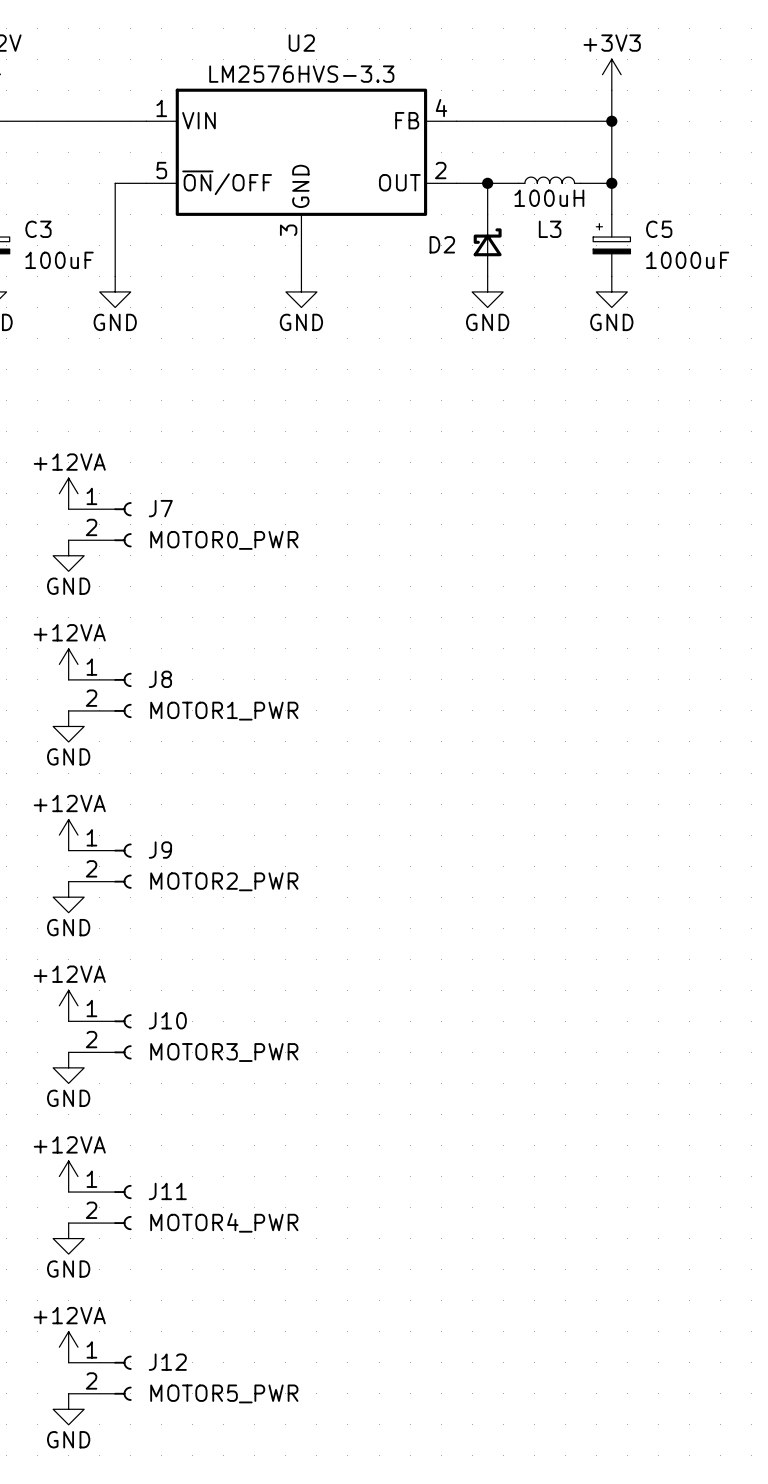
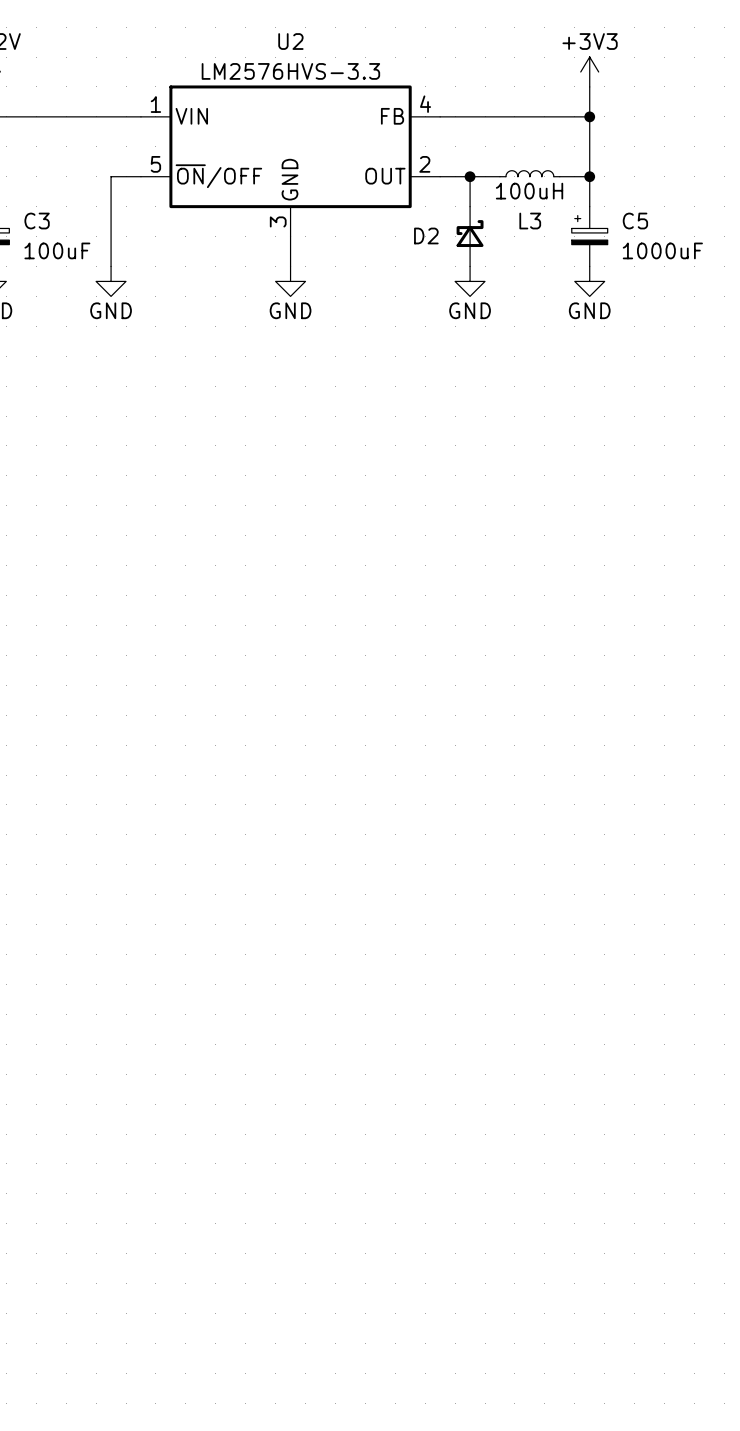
power symbol: +12VA (68, 493) -> none
J7: MOTOR0_PWR (100, 524) -> none
power symbol: GND (68, 555) -> none
power symbol: +12VA (68, 664) -> none
J8: MOTOR1_PWR (100, 695) -> none
power symbol: GND (68, 726) -> none
power symbol: +12VA (68, 835) -> none
J9: MOTOR2_PWR (100, 866) -> none
power symbol: GND (68, 897) -> none
power symbol: +12VA (68, 1005) -> none
J10: MOTOR3_PWR (100, 1036) -> none
power symbol: GND (68, 1067) -> none
power symbol: +12VA (68, 1176) -> none
J11: MOTOR4_PWR (100, 1207) -> none
power symbol: GND (68, 1238) -> none
power symbol: +12VA (68, 1347) -> none
J12: MOTOR5_PWR (100, 1378) -> none
power symbol: GND (68, 1409) -> none

